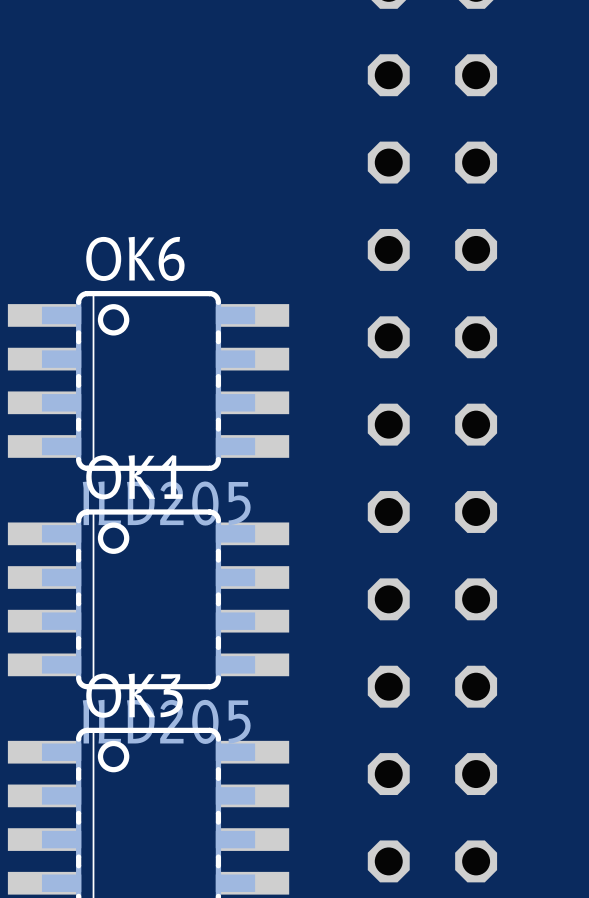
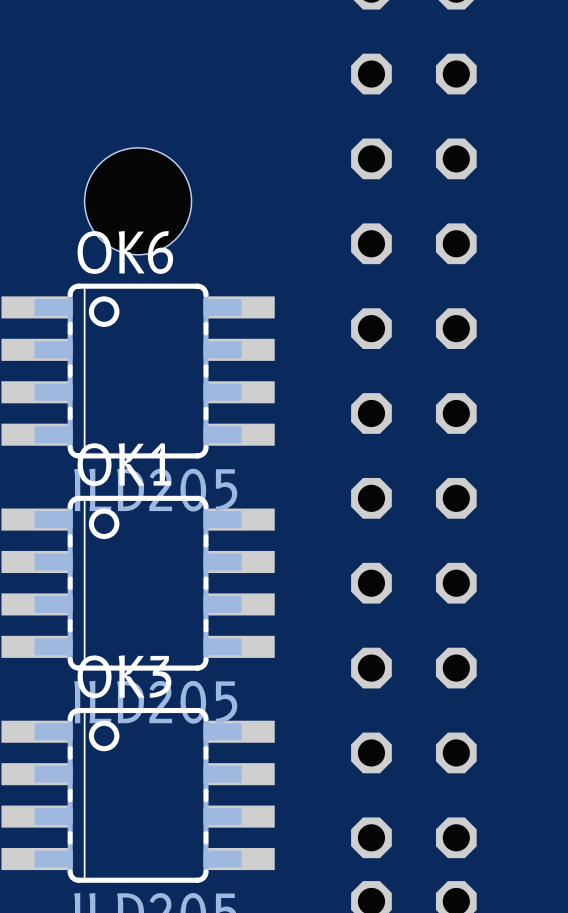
hole: none -> (138, 201)

